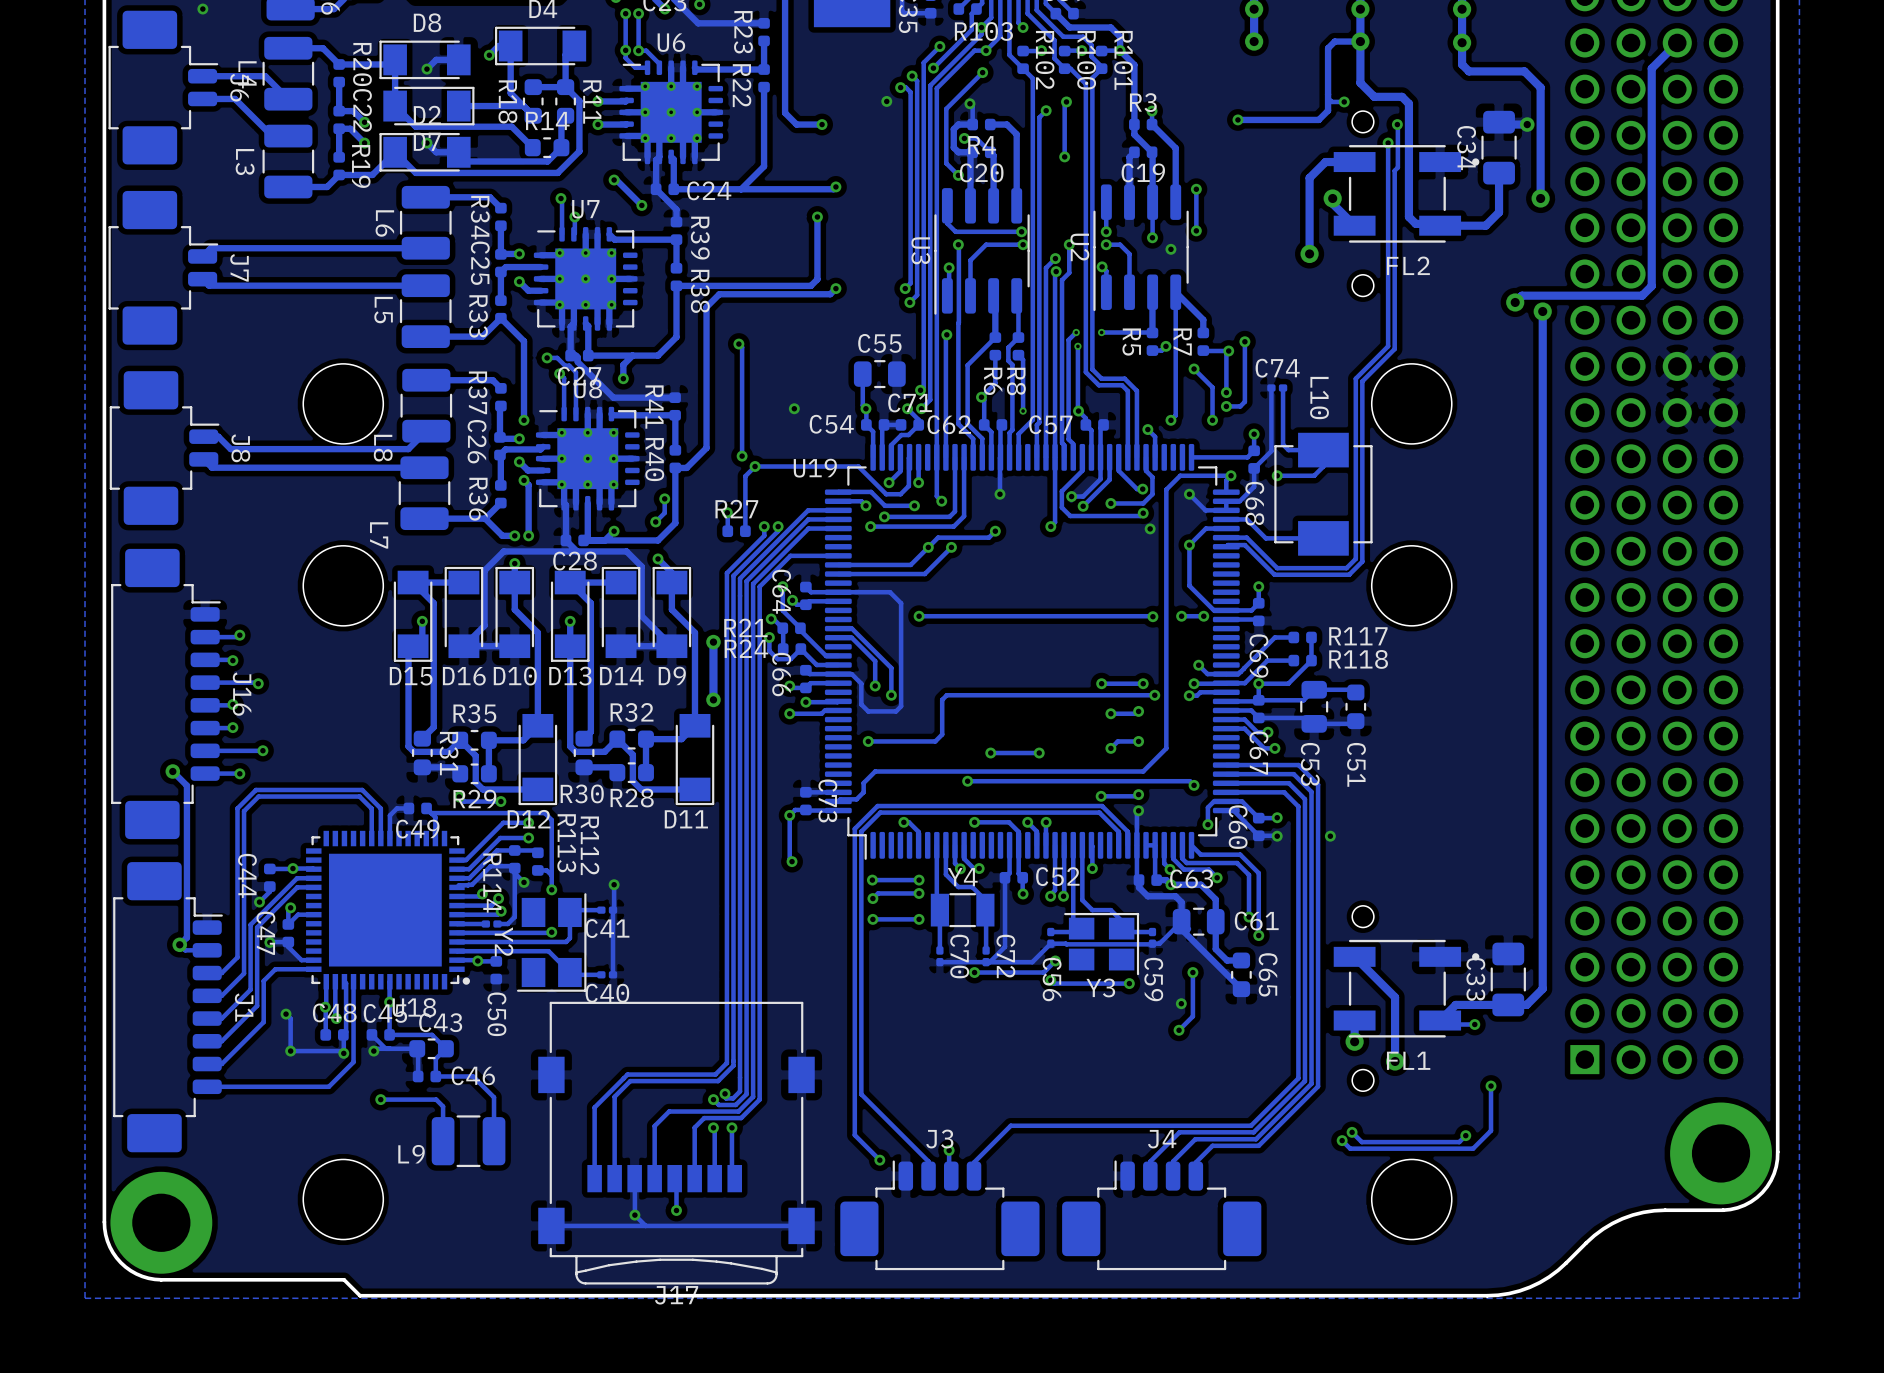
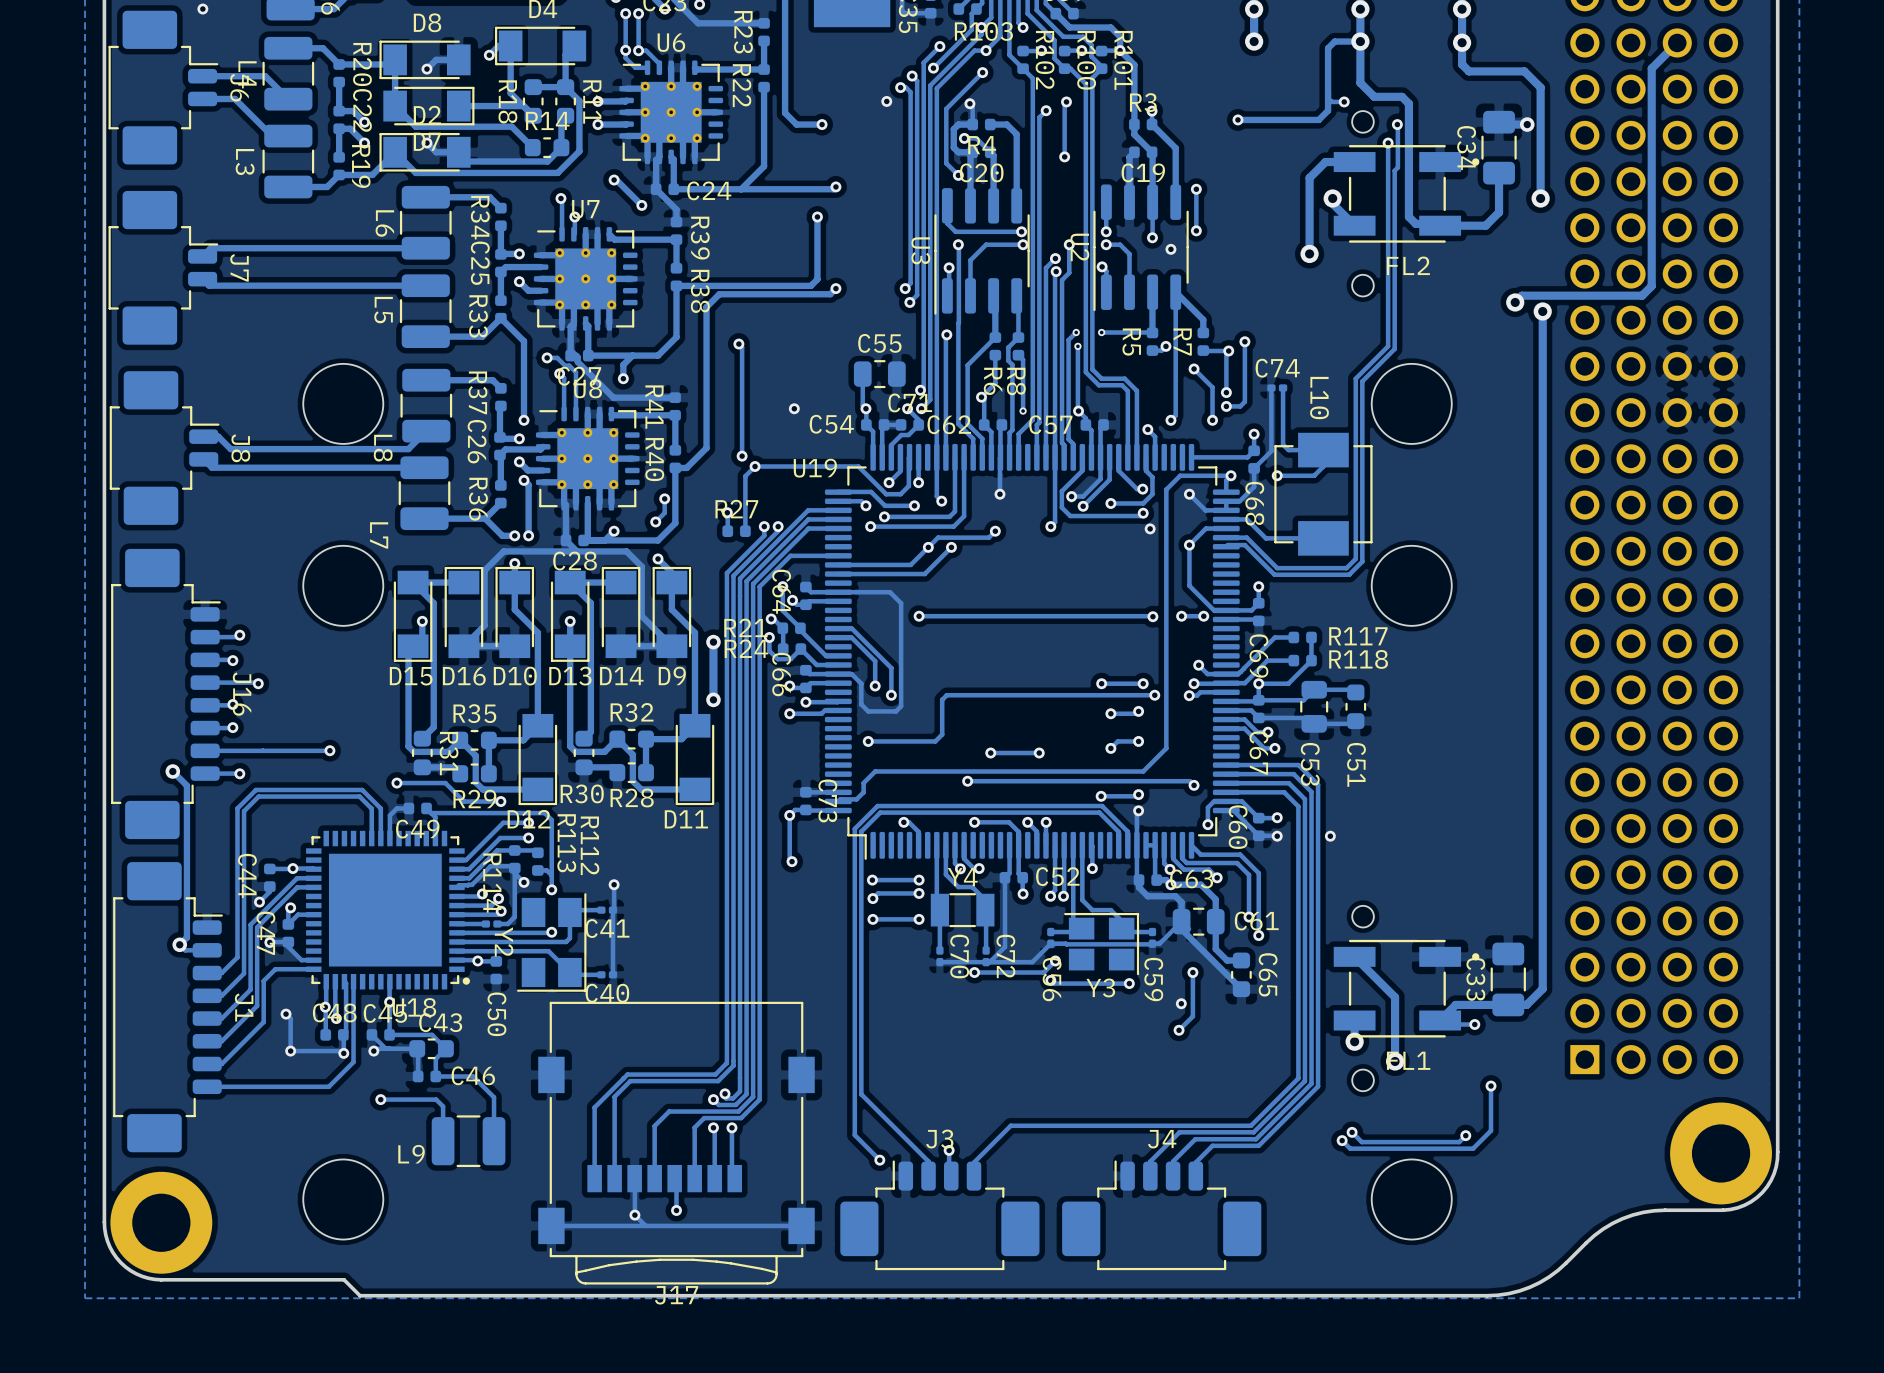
via position: (262, 750) -> (329, 750)
track: none -> (329, 750) (262, 750)
track: none -> (396, 783) (445, 783) (459, 796)
via position: (459, 796) -> (396, 783)

